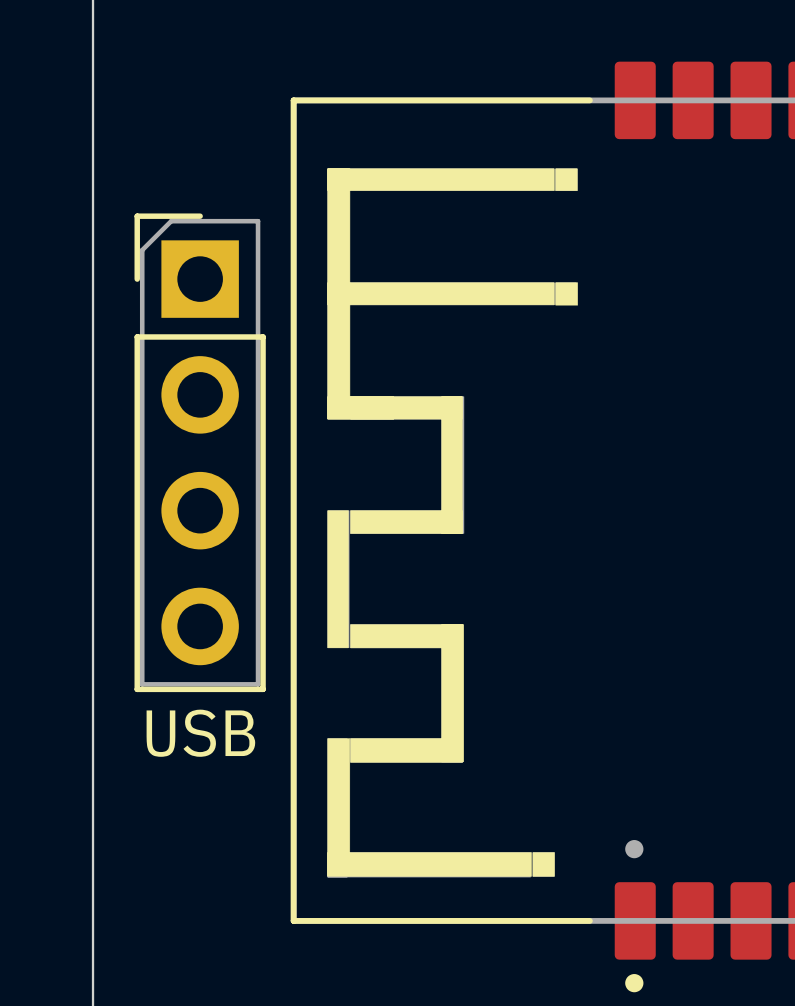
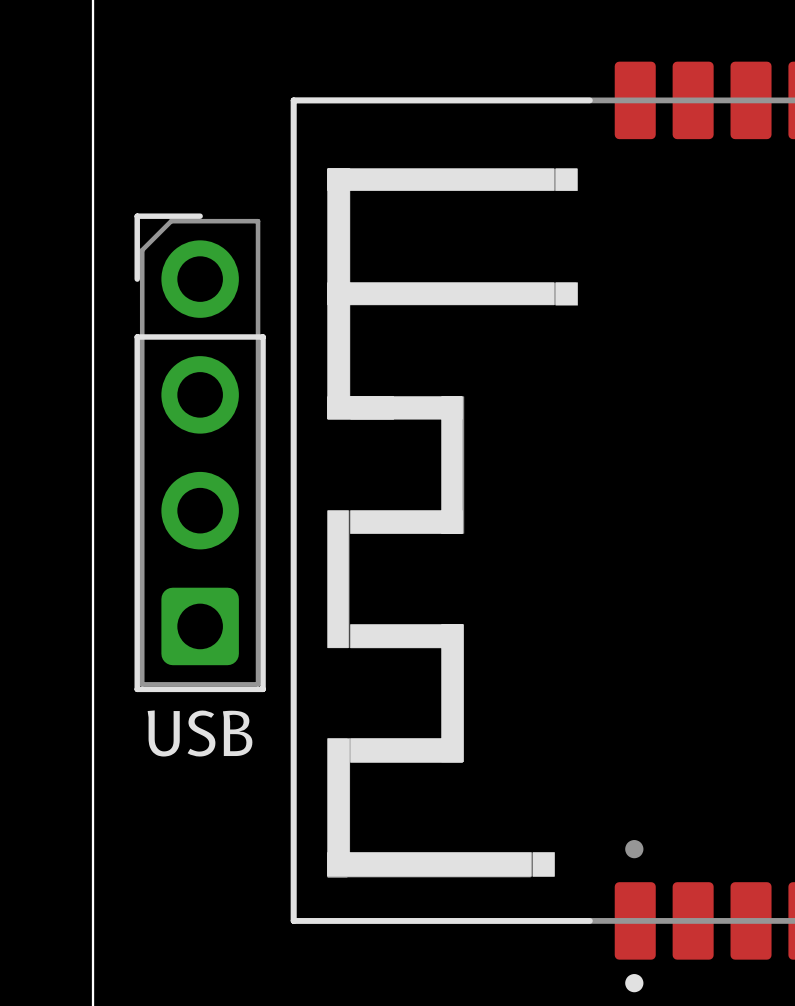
part footprint: [134, 213, 266, 693] -> [134, 213, 266, 693]

